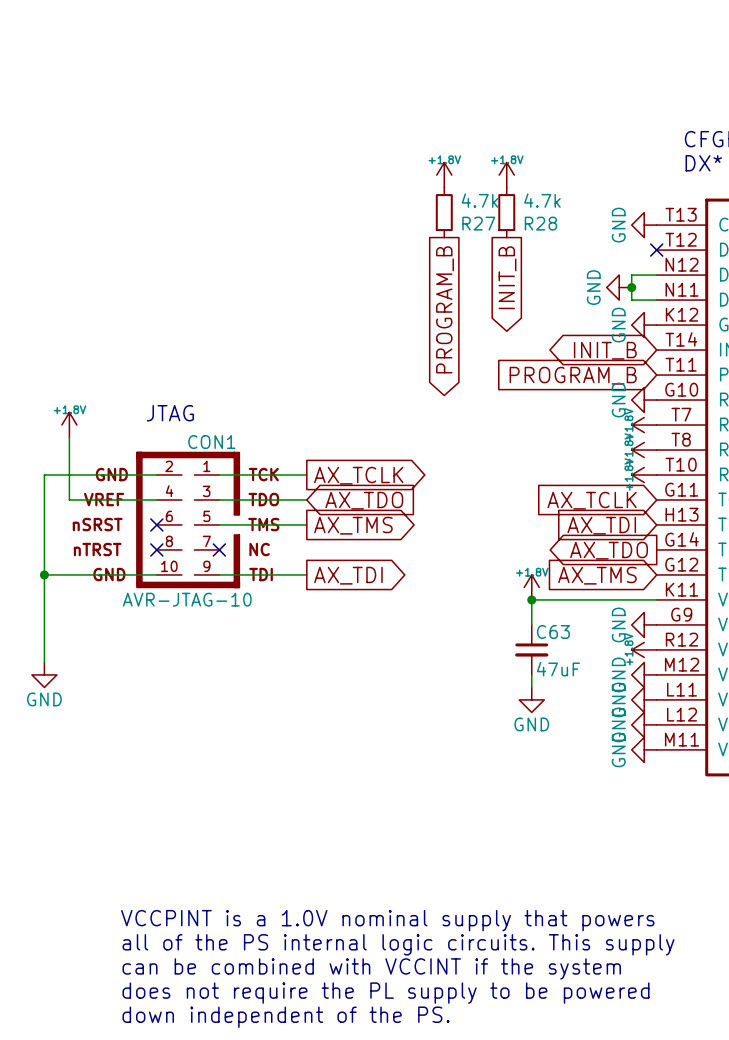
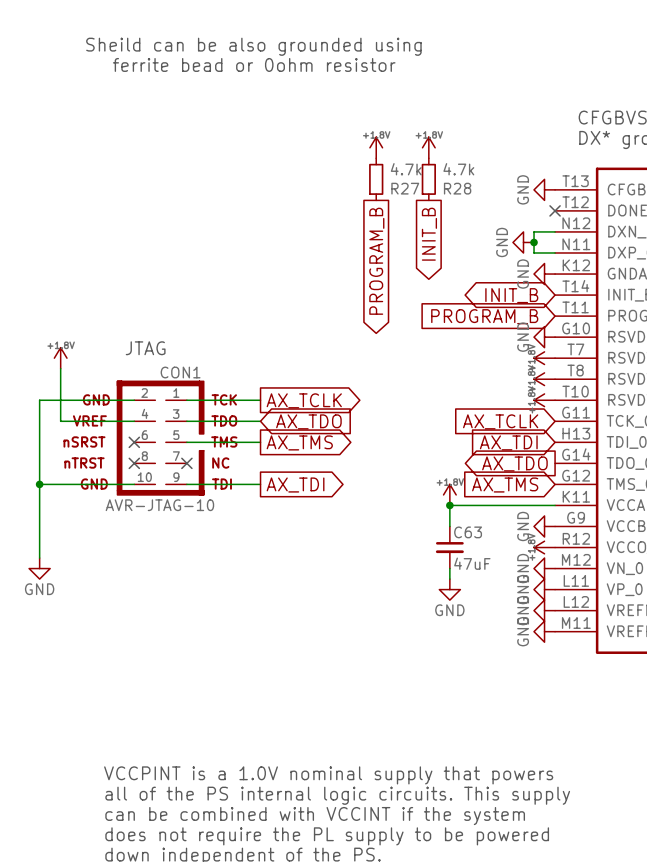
text: none -> Sheild can be also grounded using (253, 46)
text: none -> ferrite bead or 0ohm resistor (254, 64)

